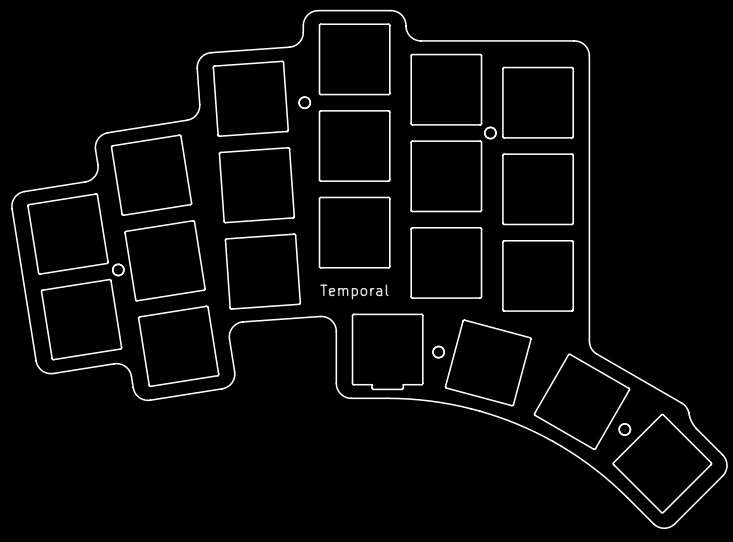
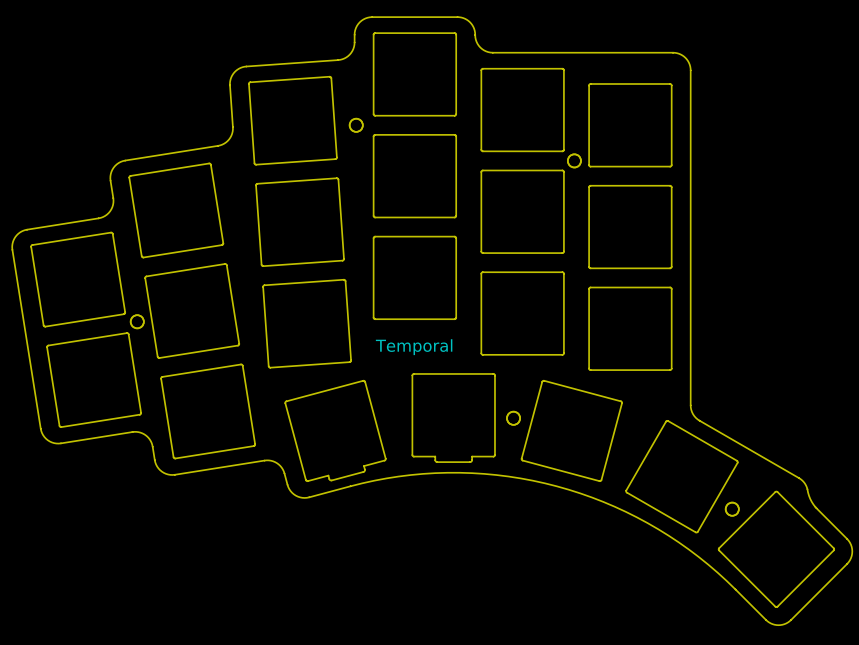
board edge: none -> (363, 380) (285, 402) (306, 481) (328, 475) (331, 480) (363, 471) (363, 466) (385, 459) (363, 380)
board edge: (222, 388) (230, 384) (234, 376) (229, 337) (230, 330) (235, 325) (243, 321) (325, 317) (332, 321) (335, 327) (336, 385) (338, 390) (343, 396) (351, 398) (429, 400) (460, 406) (498, 417) (535, 432) (570, 451) (604, 476) (627, 497) -> (259, 461) (271, 460) (278, 464) (283, 471) (290, 491) (302, 497) (386, 478) (435, 473) (496, 475) (556, 486) (603, 501) (647, 523) (688, 549) (735, 589)

